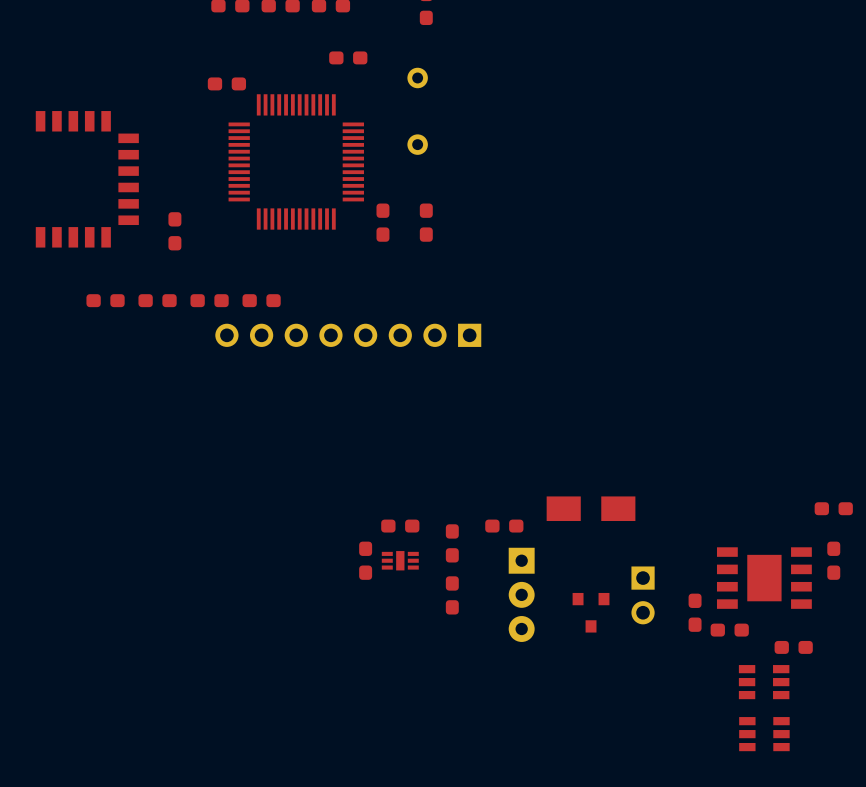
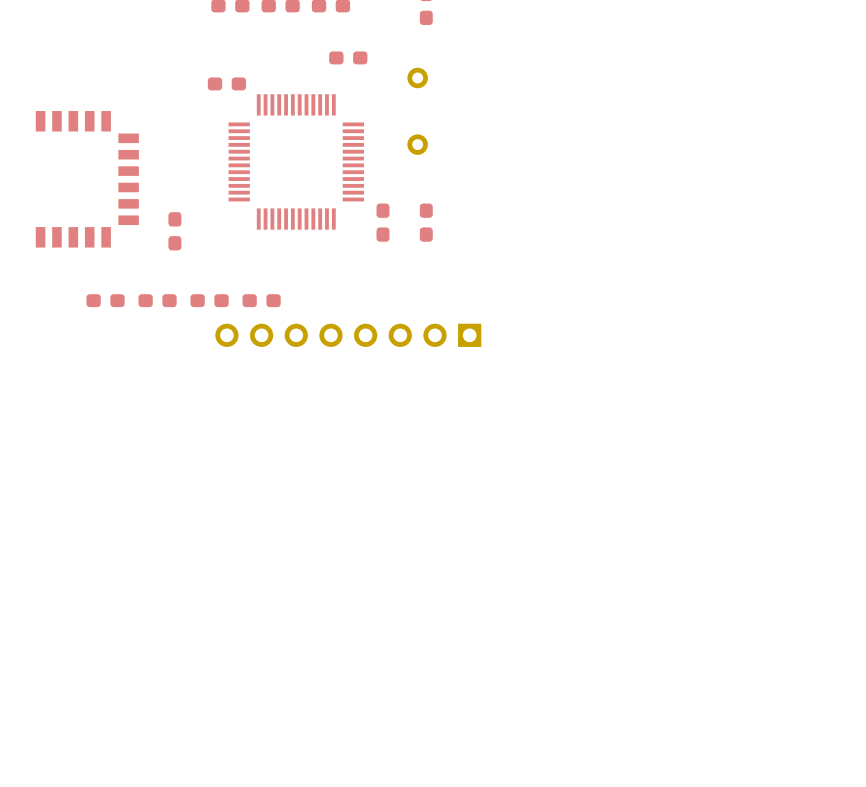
part: (591, 508) -> none
part: (833, 508) -> none
part: (400, 526) -> none
part: (504, 526) -> none
part: (452, 543) -> none
part: (365, 560) -> none
part: (400, 560) -> none
part: (833, 560) -> none
part: (764, 578) -> none
part: (521, 594) -> none
part: (452, 595) -> none
part: (643, 595) -> none
part: (591, 612) -> none
part: (695, 612) -> none
part: (729, 630) -> none
part: (793, 647) -> none
part: (764, 682) -> none
part: (764, 734) -> none

